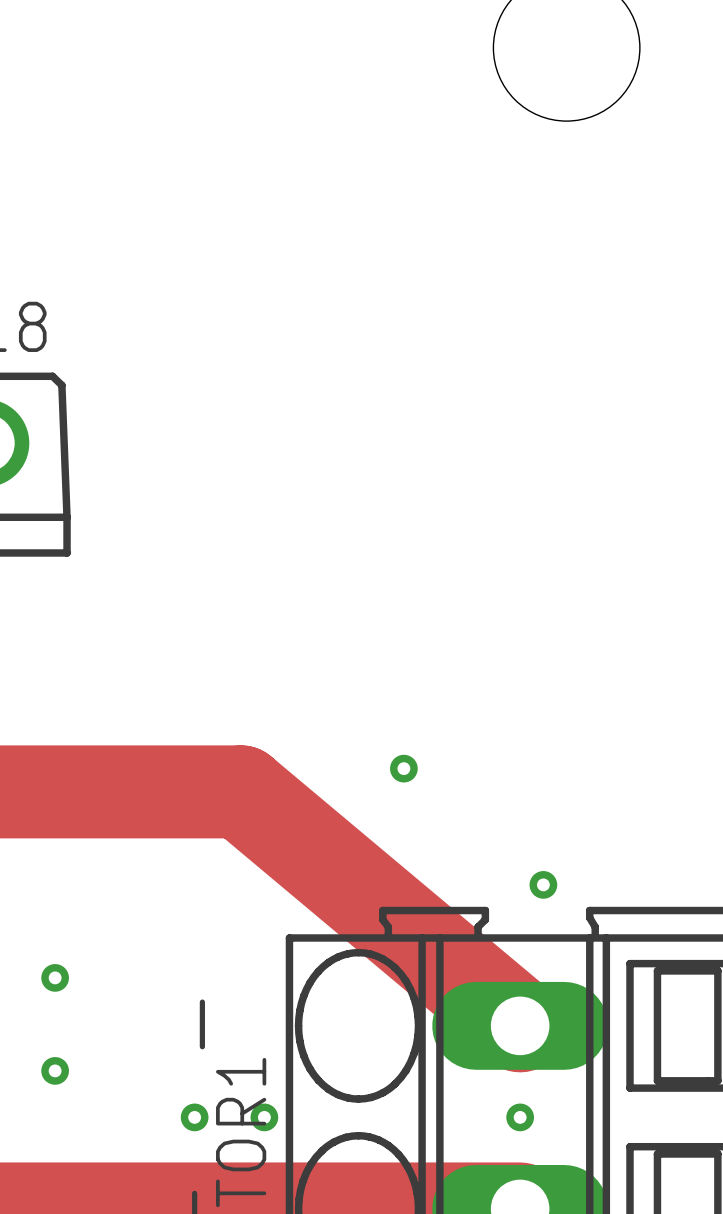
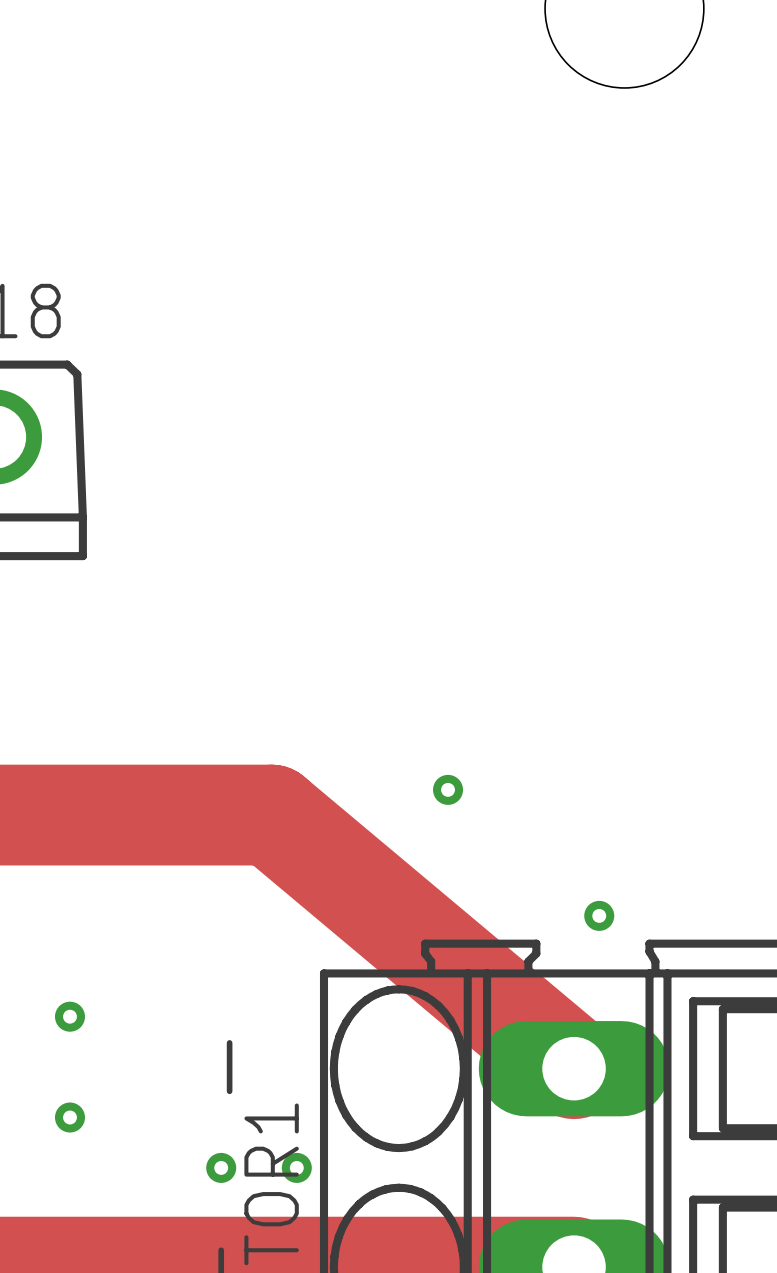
via: (520, 1117) -> none

